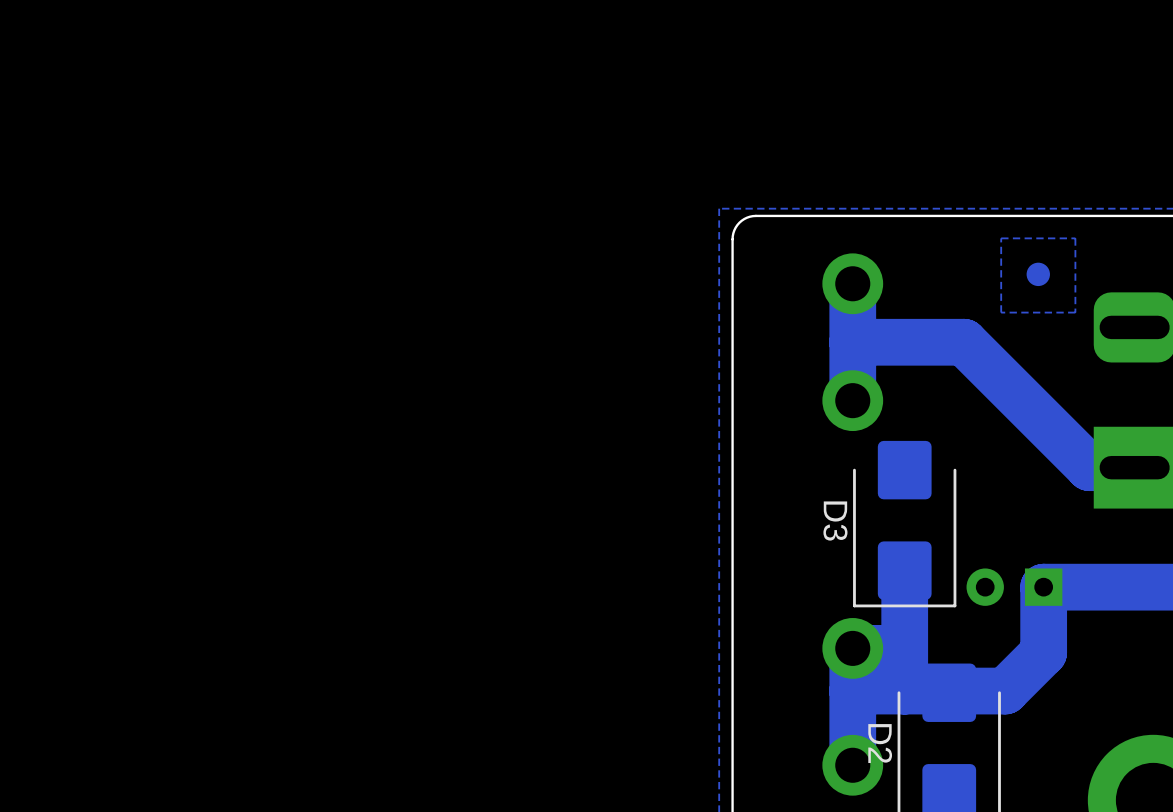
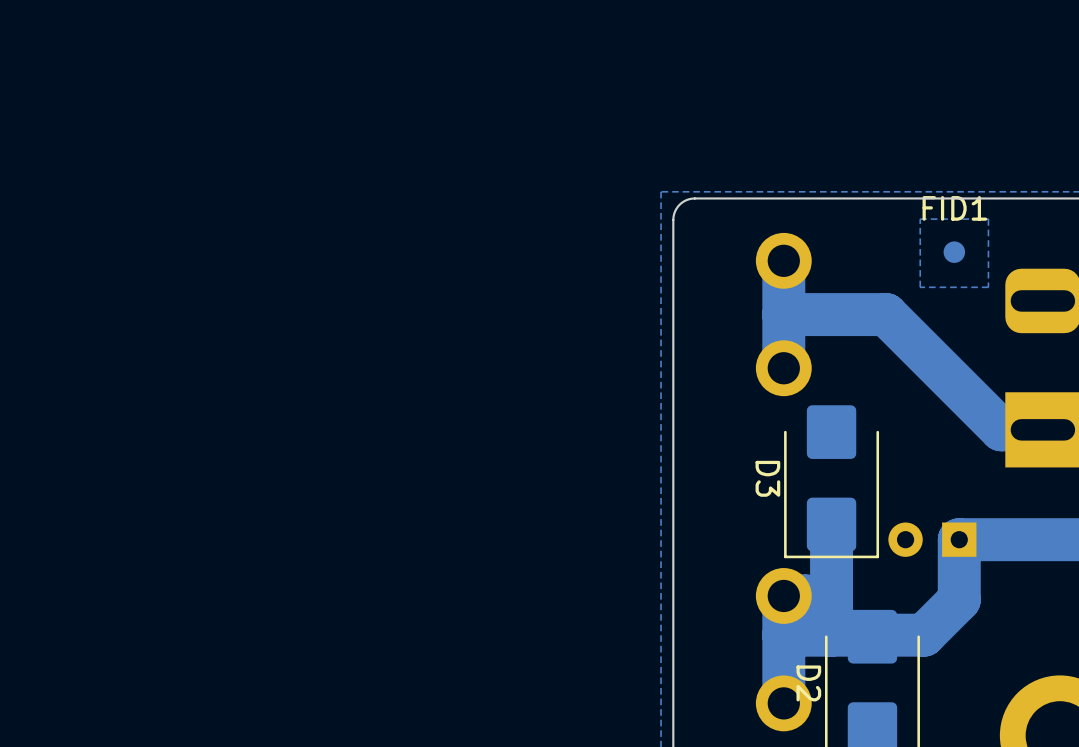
FID1 name: none -> FID1 (954, 208)

